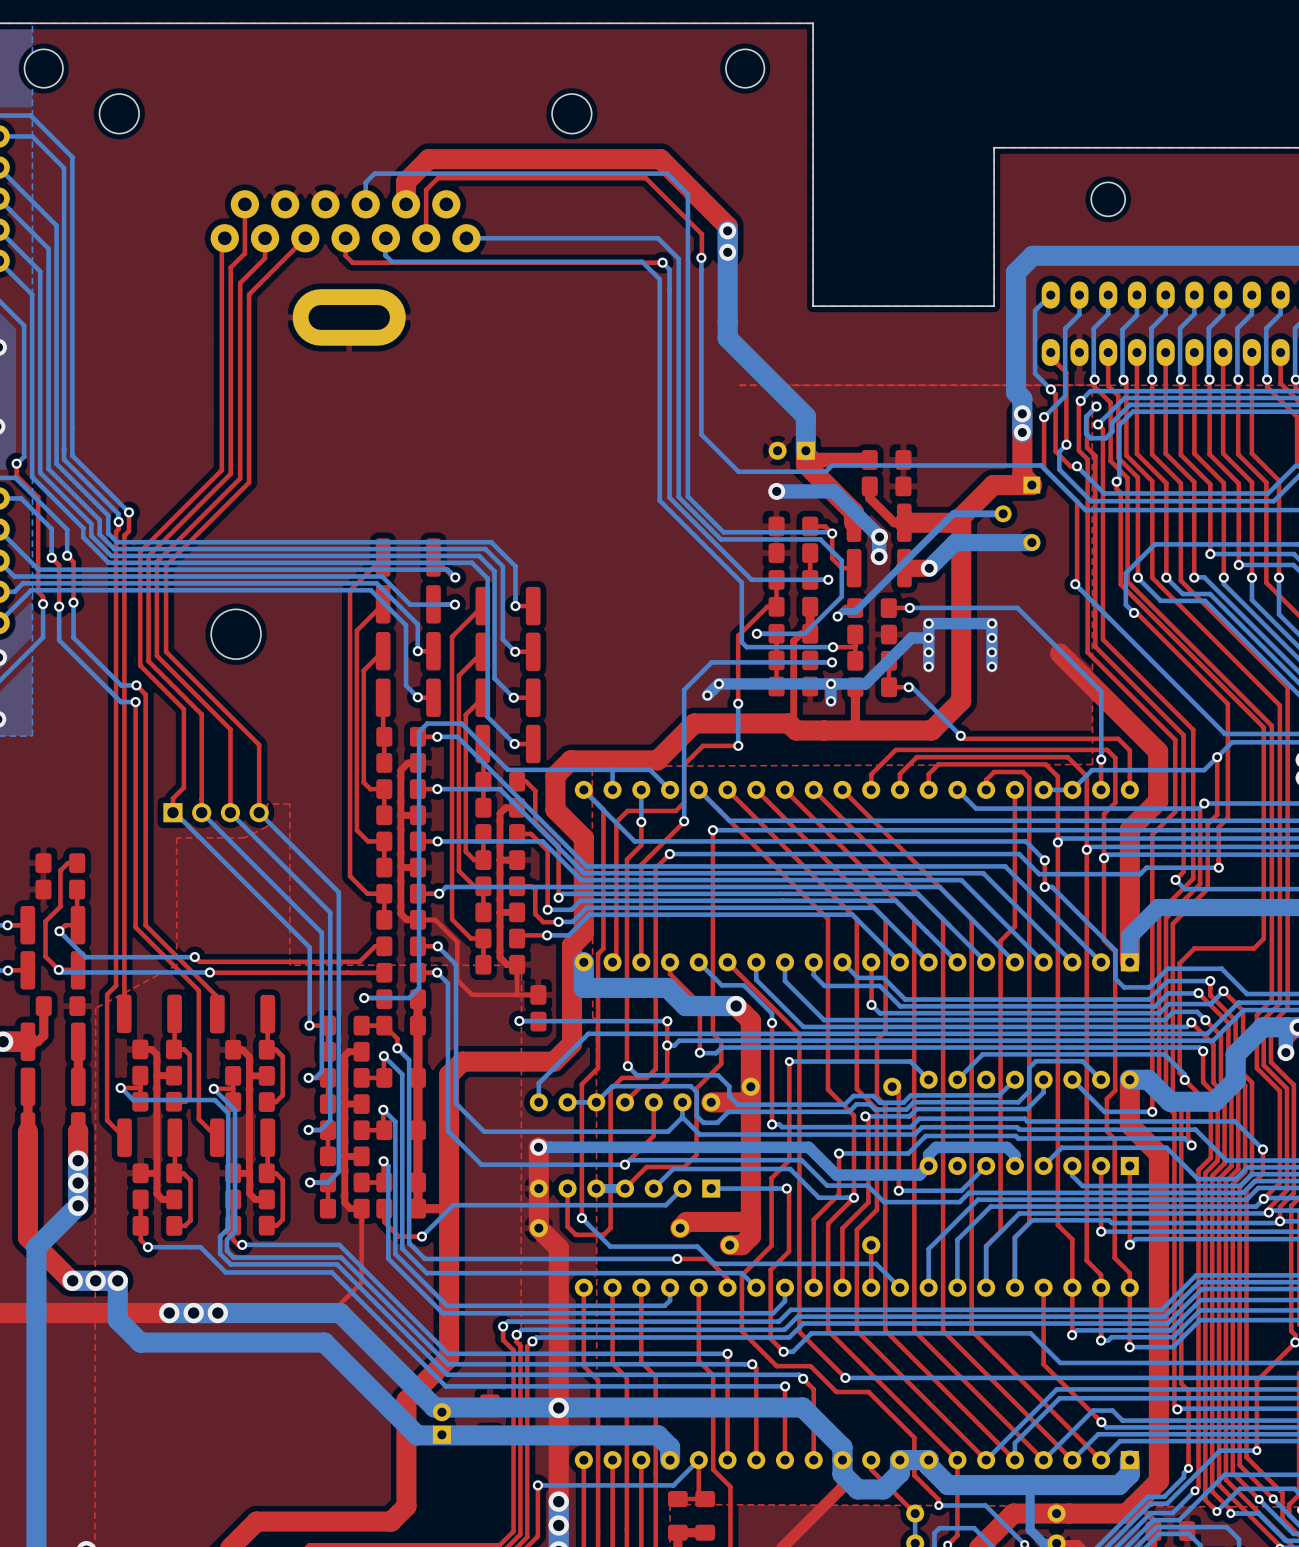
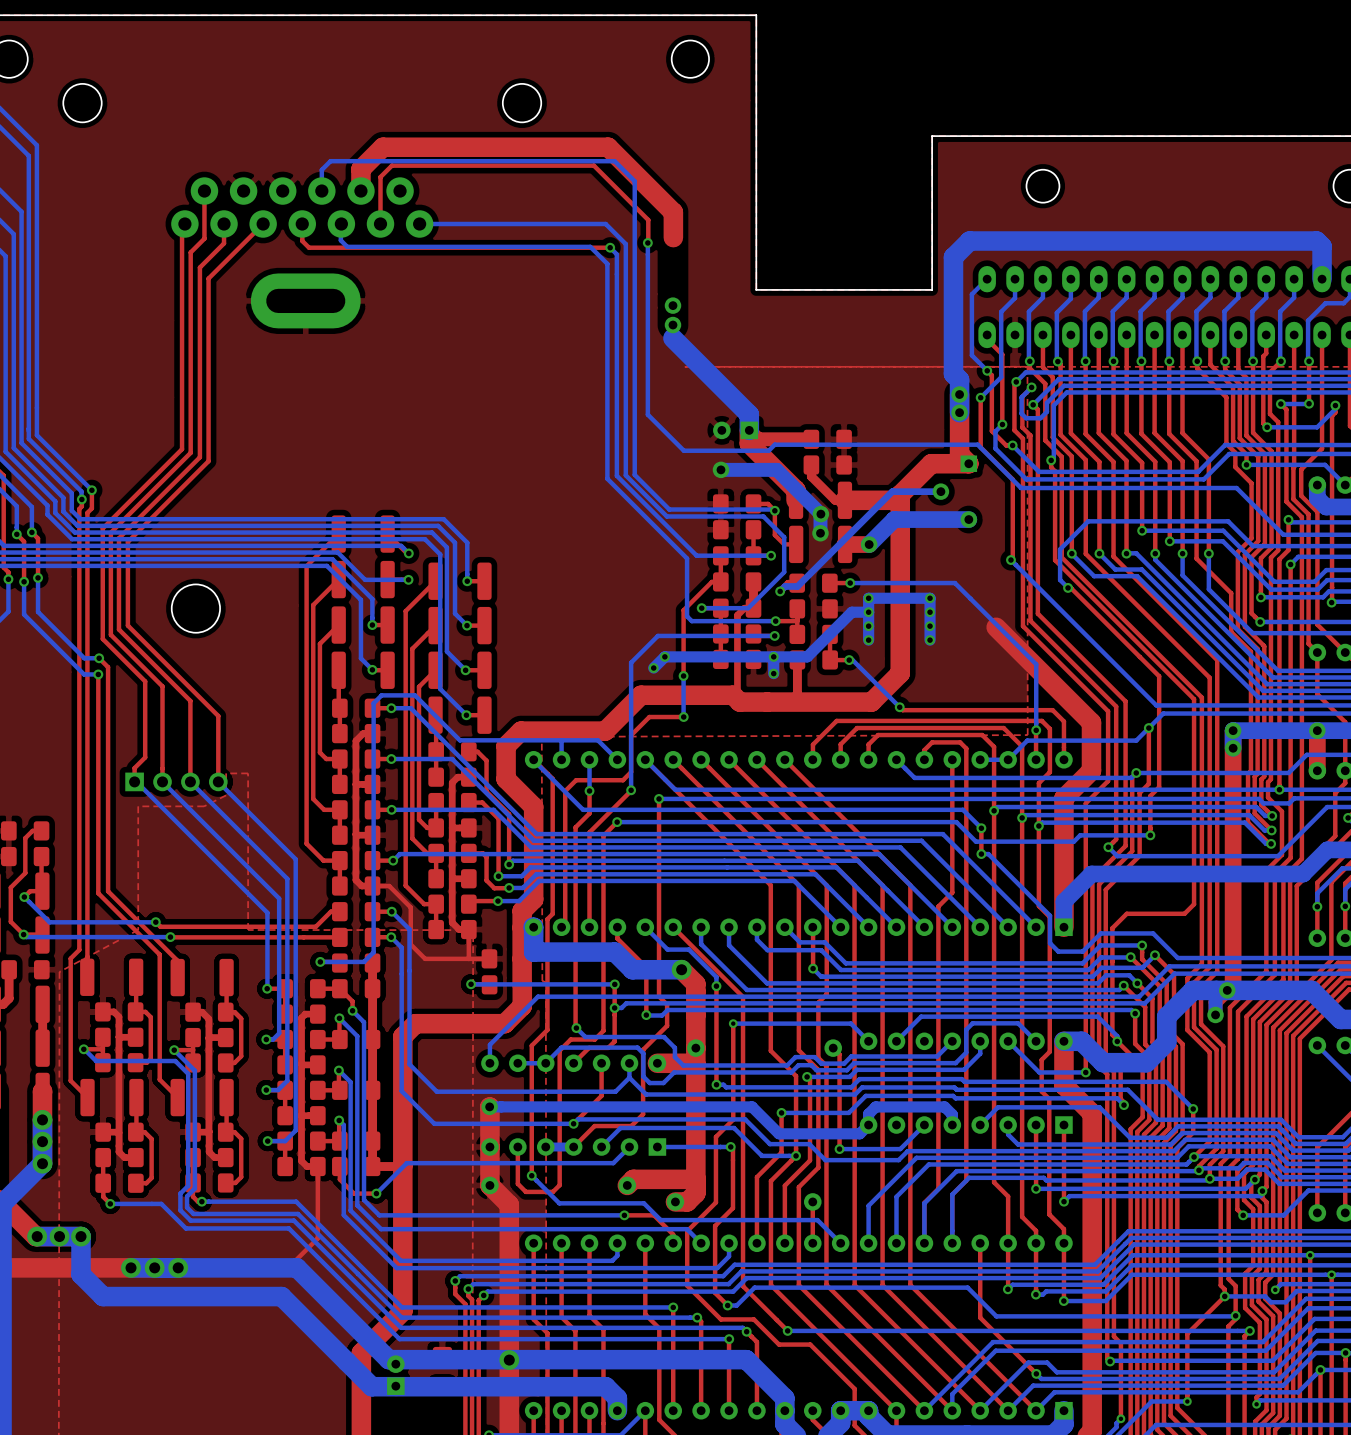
bottom track: (727, 230) (727, 338) (805, 416) (805, 434) -> (672, 338) (749, 414)
via: (727, 230) -> none
via: (727, 252) -> none
via: none -> (672, 305)
via: none -> (672, 325)

